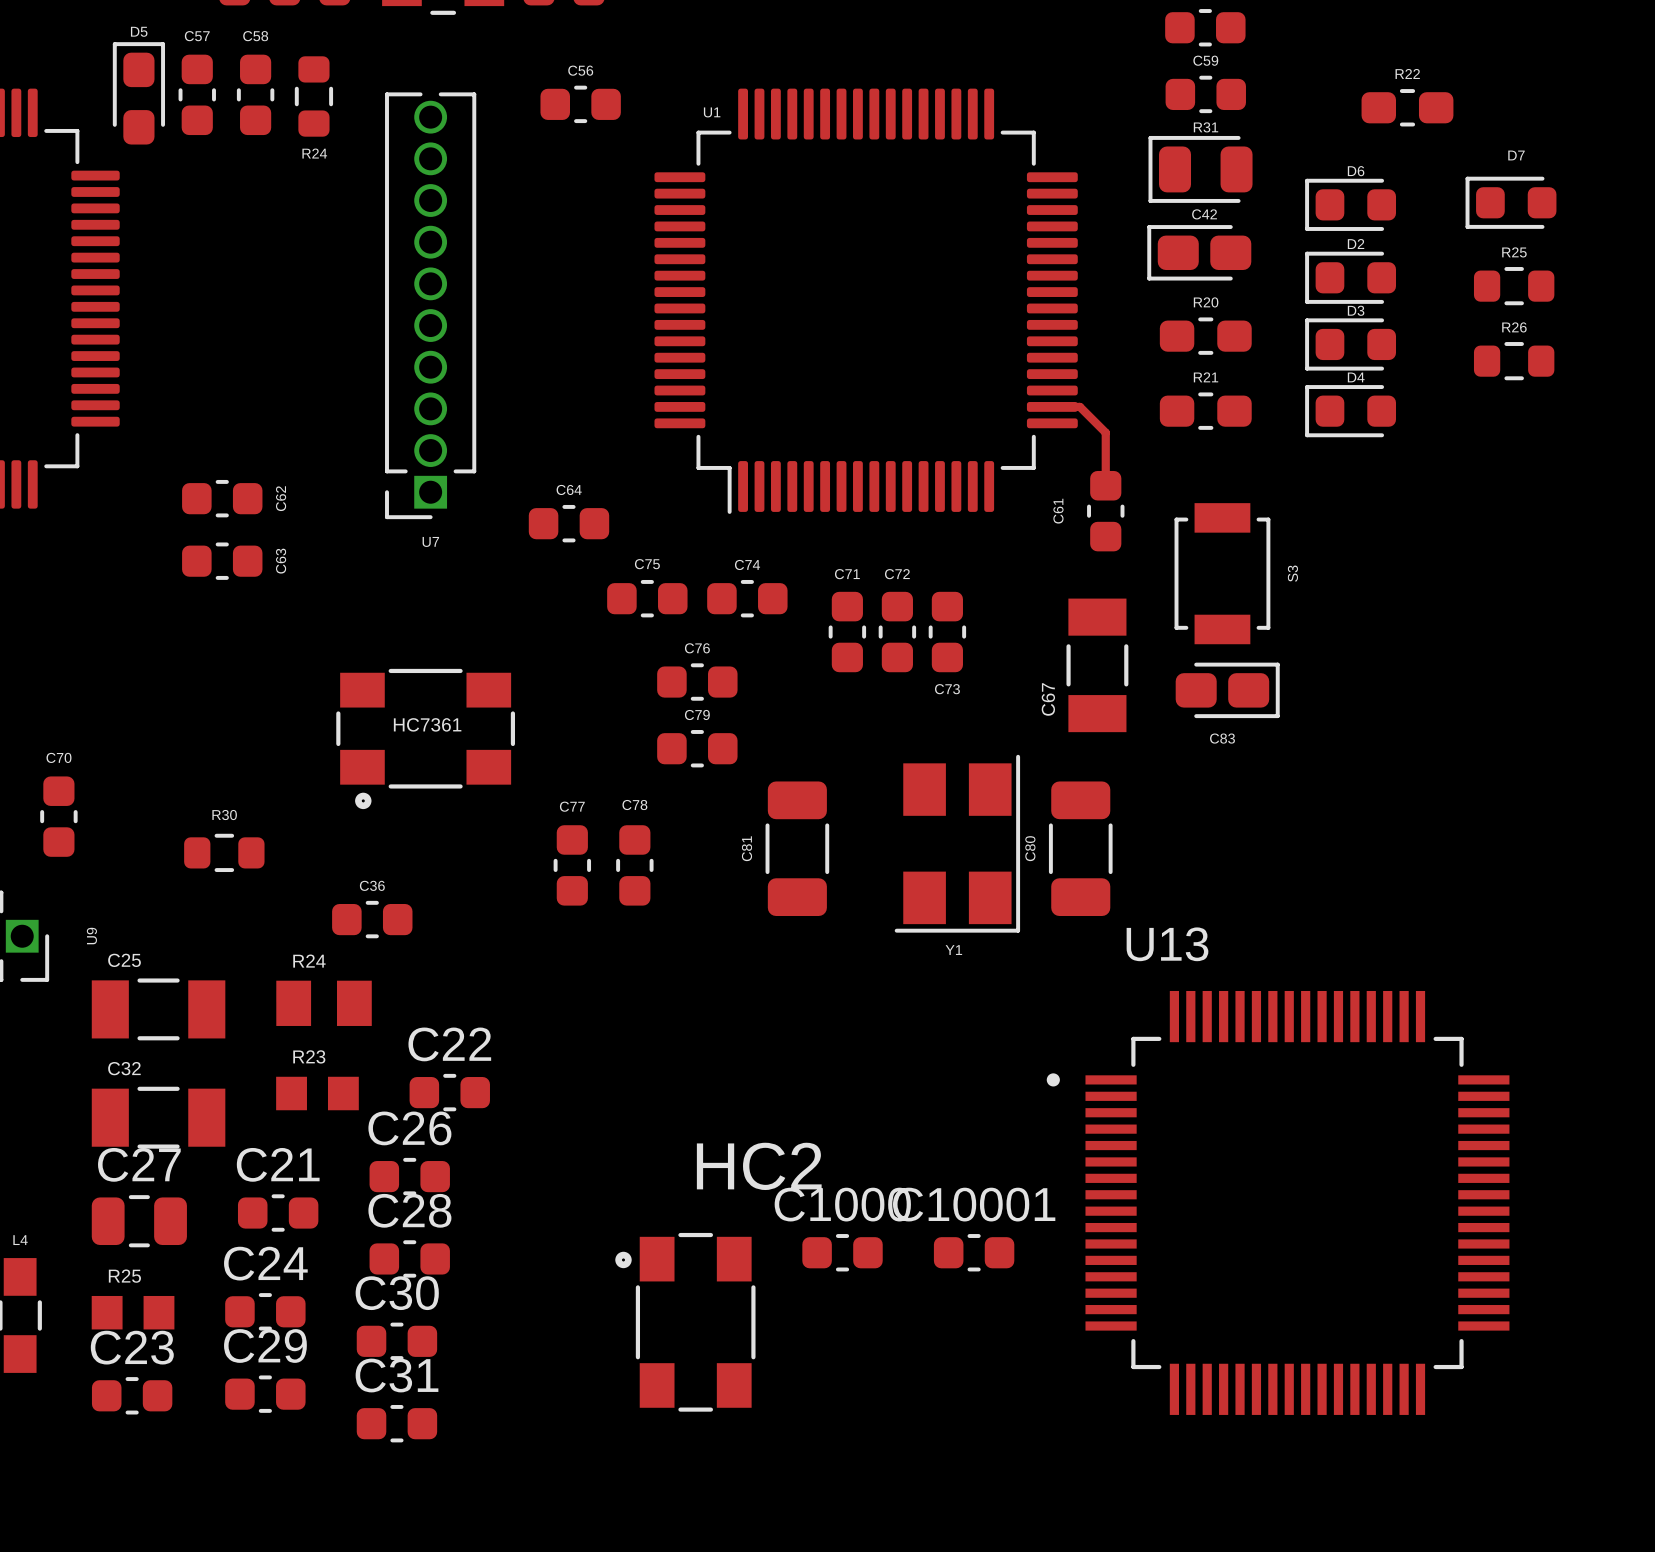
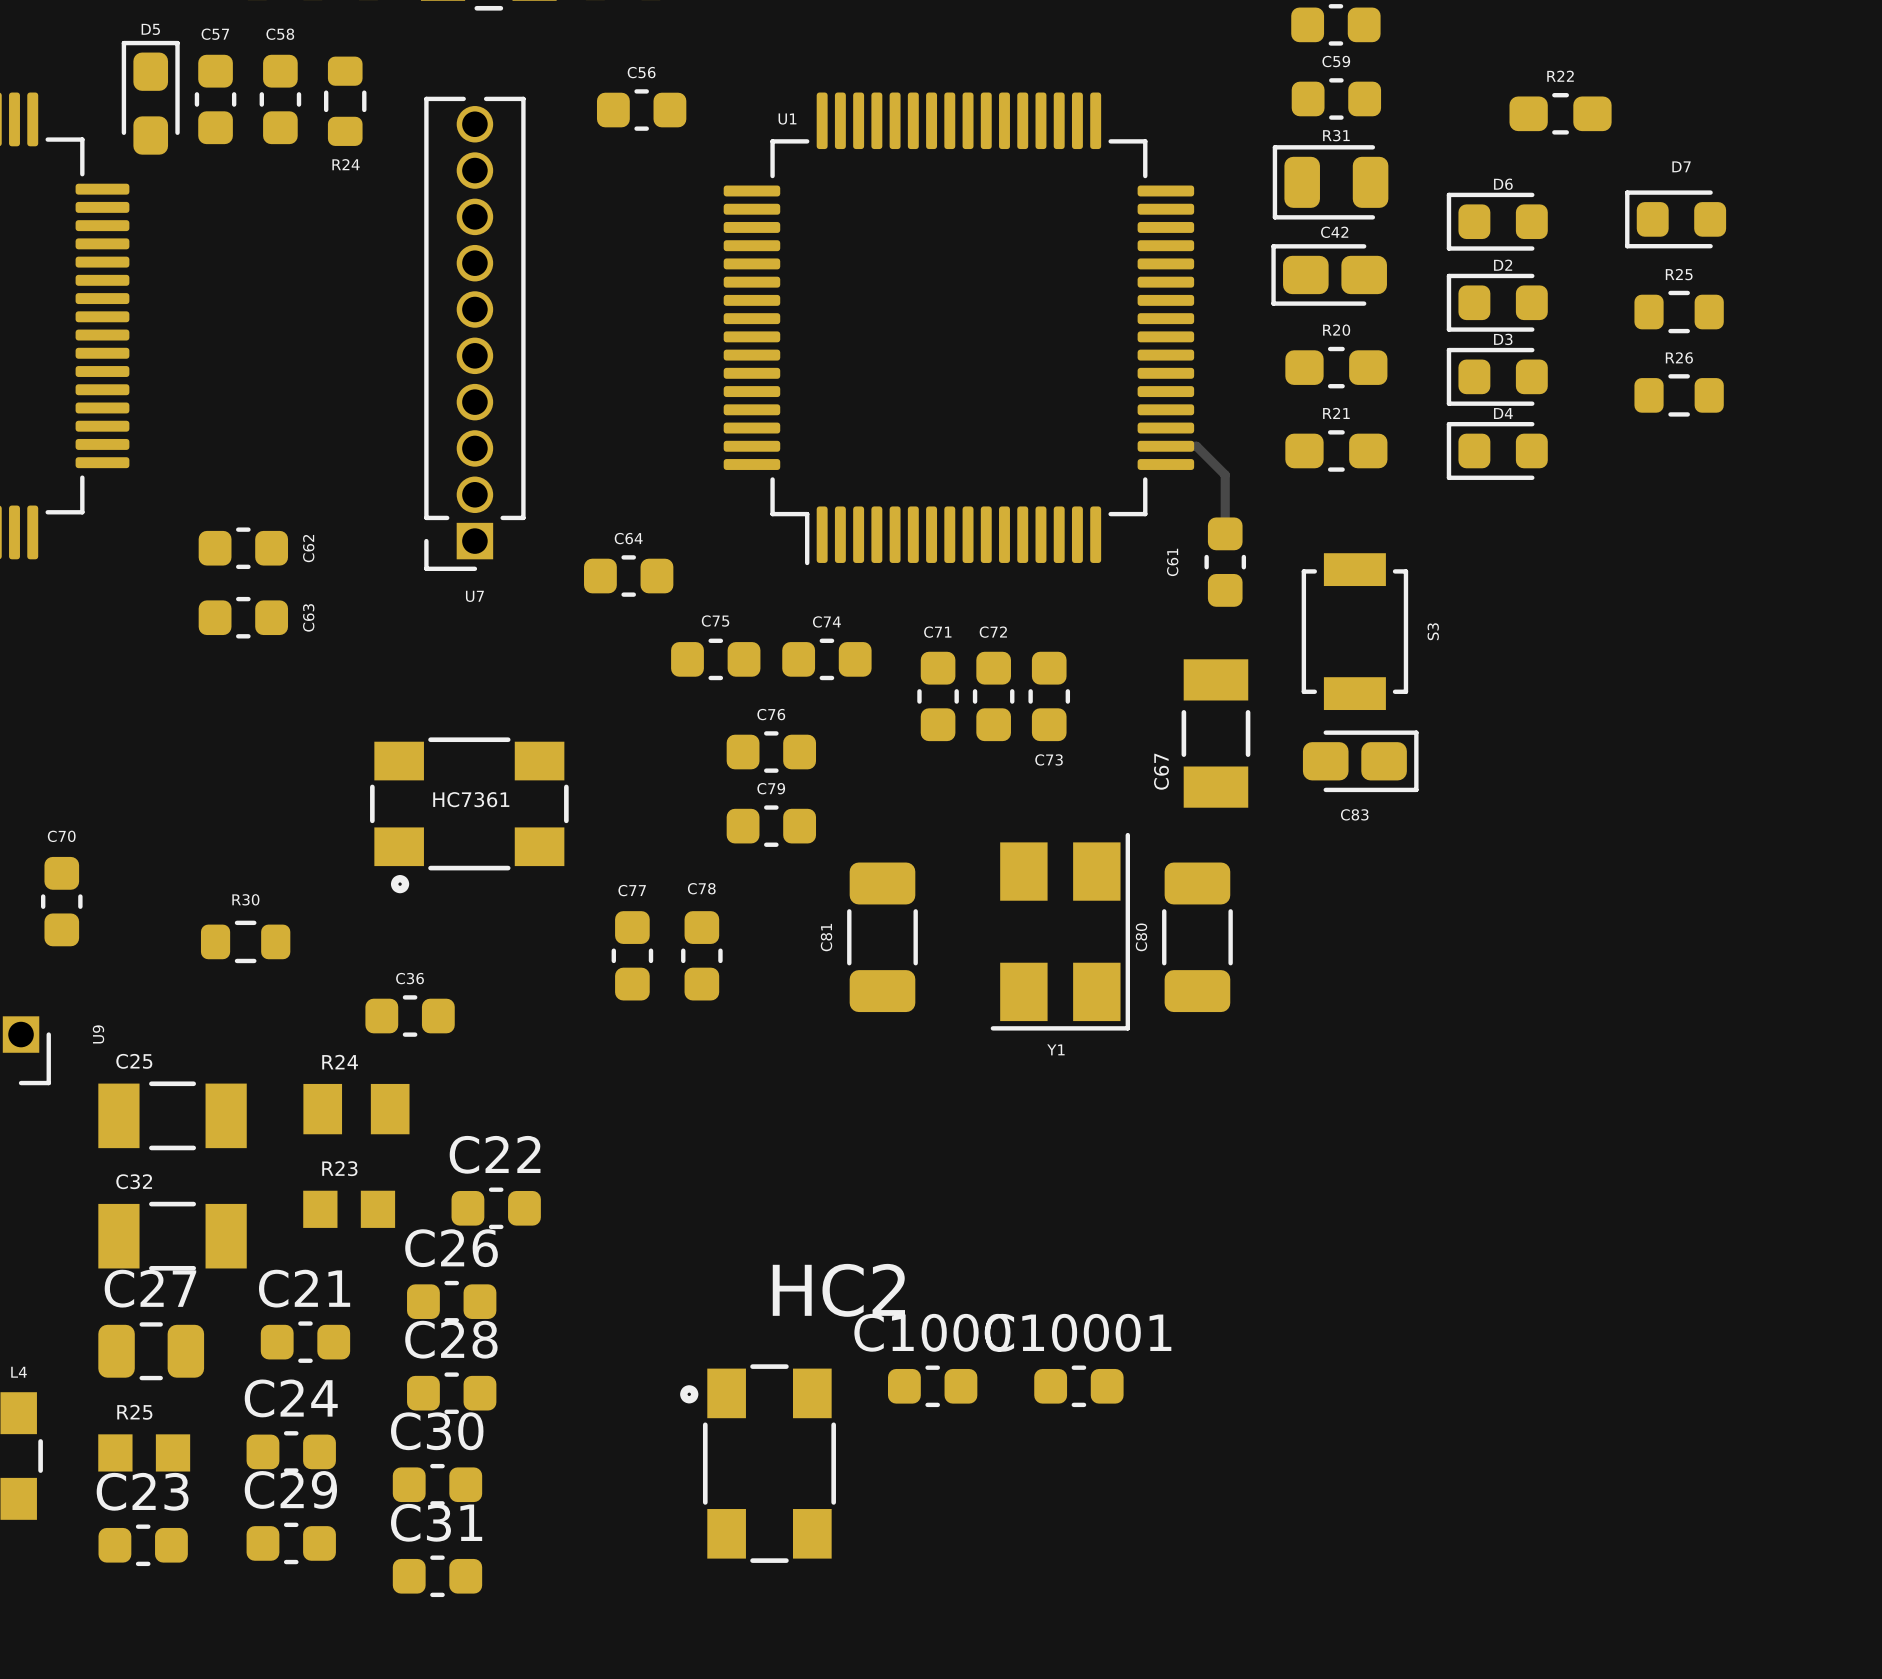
U13: (1278, 1202) -> none

